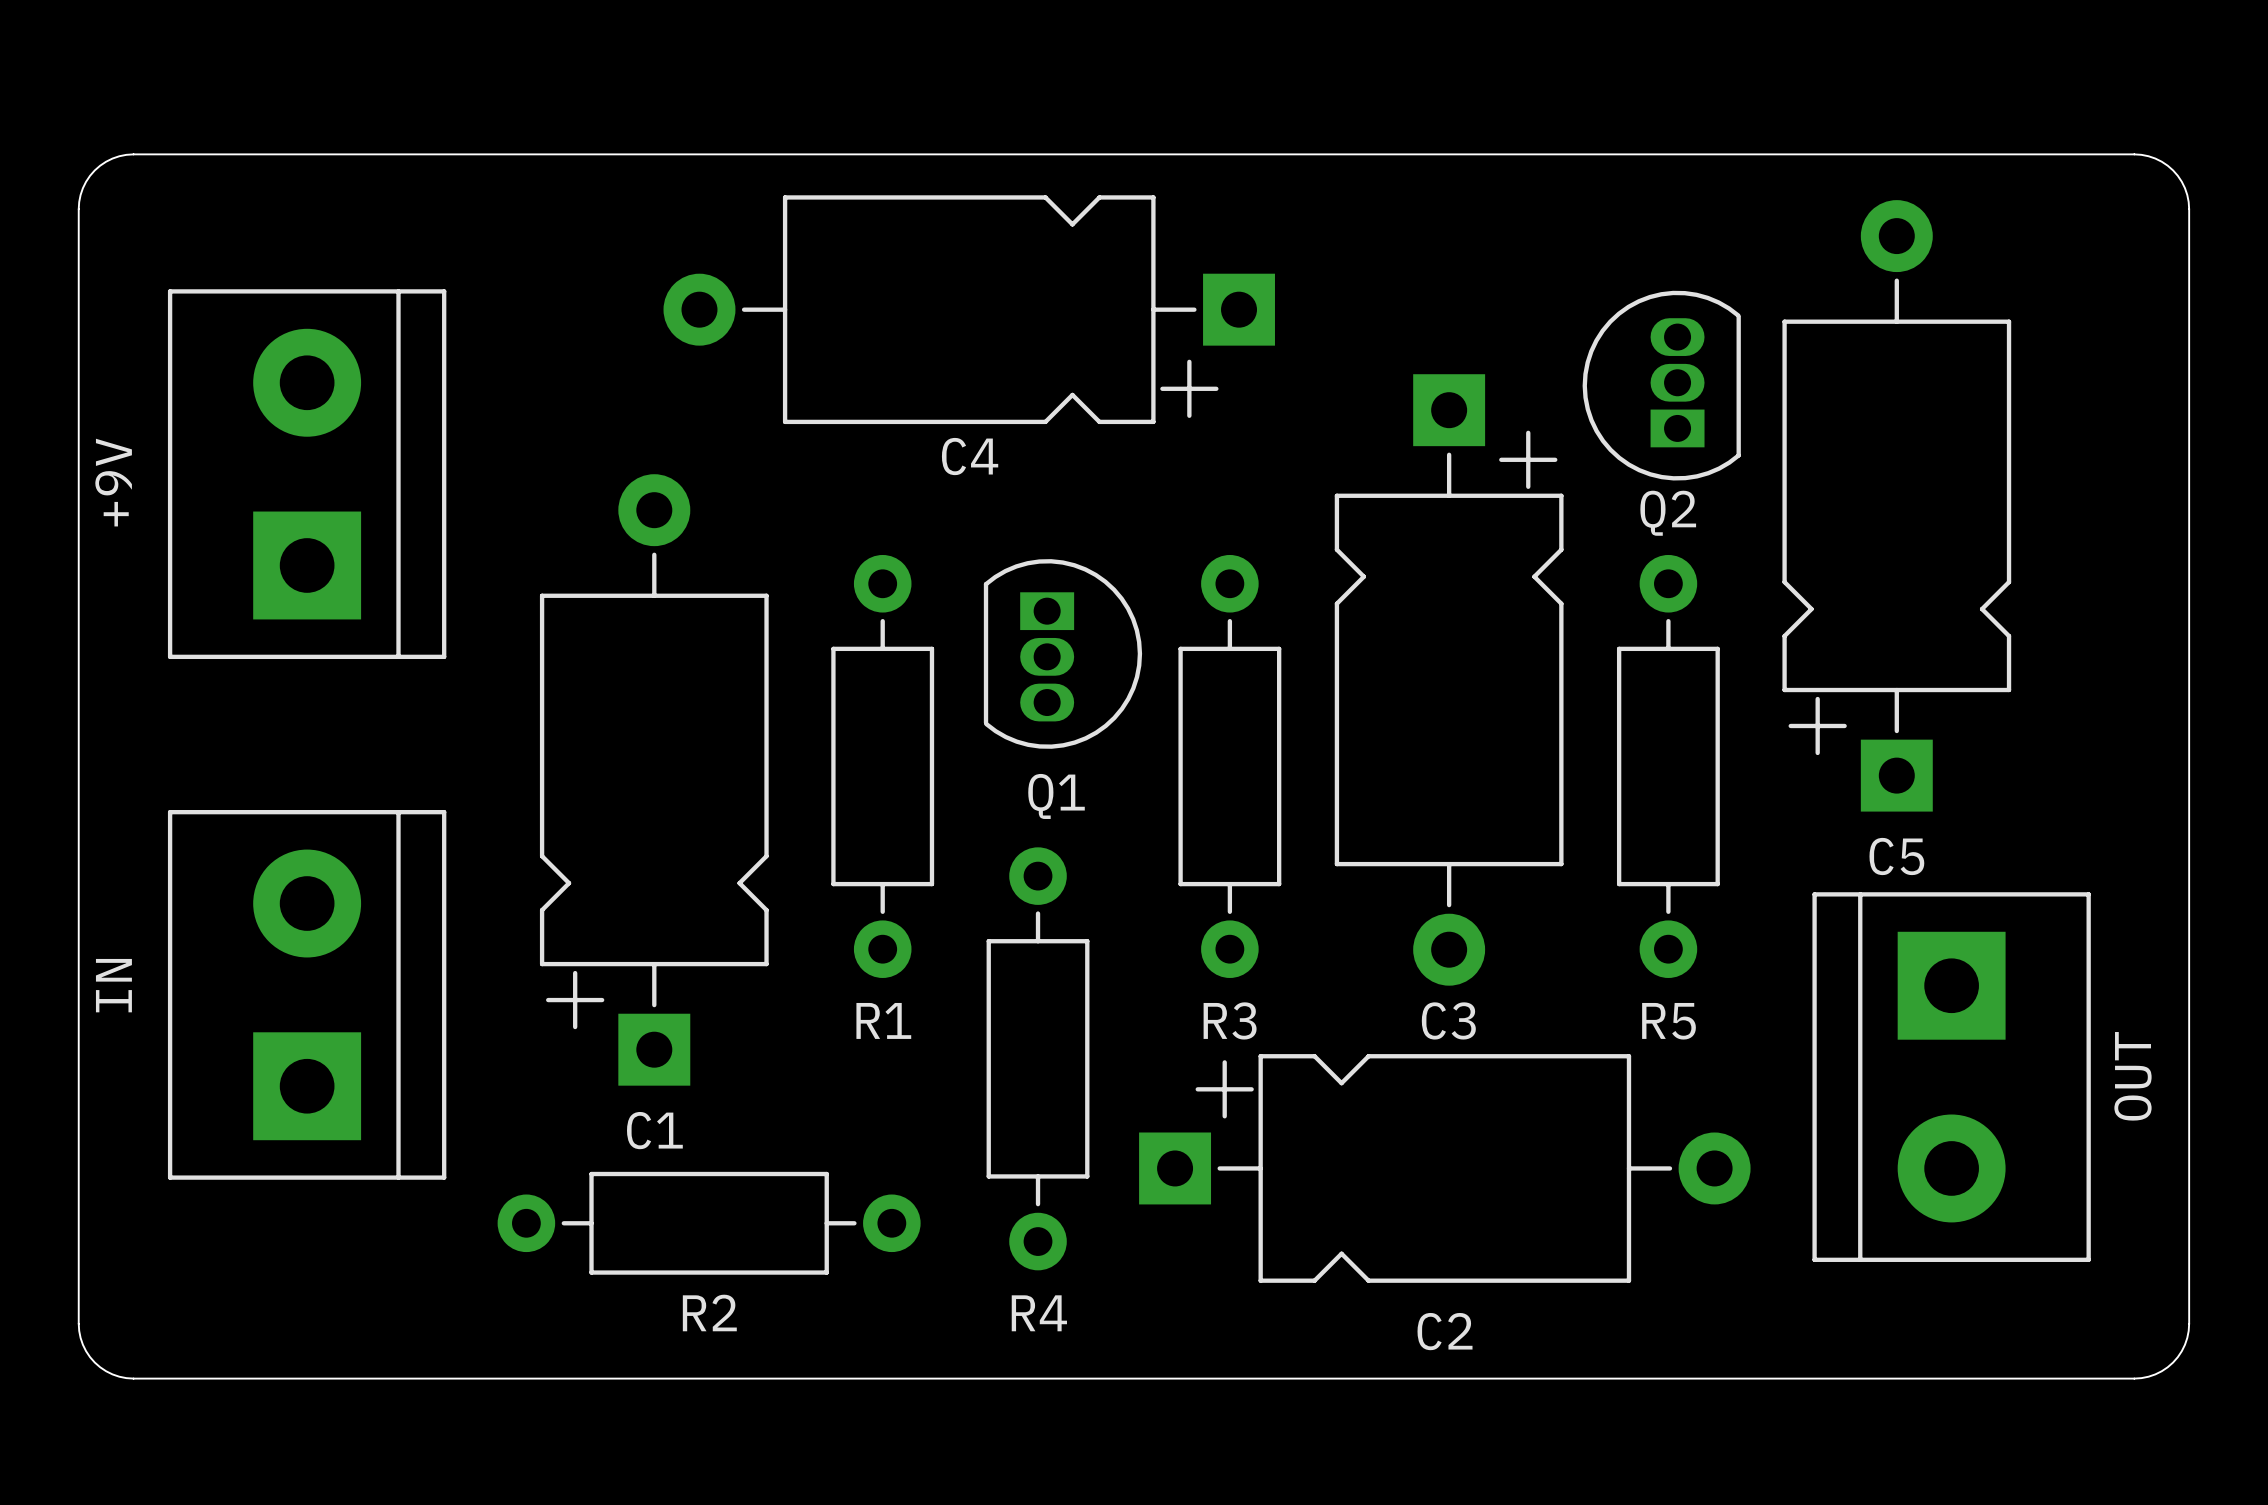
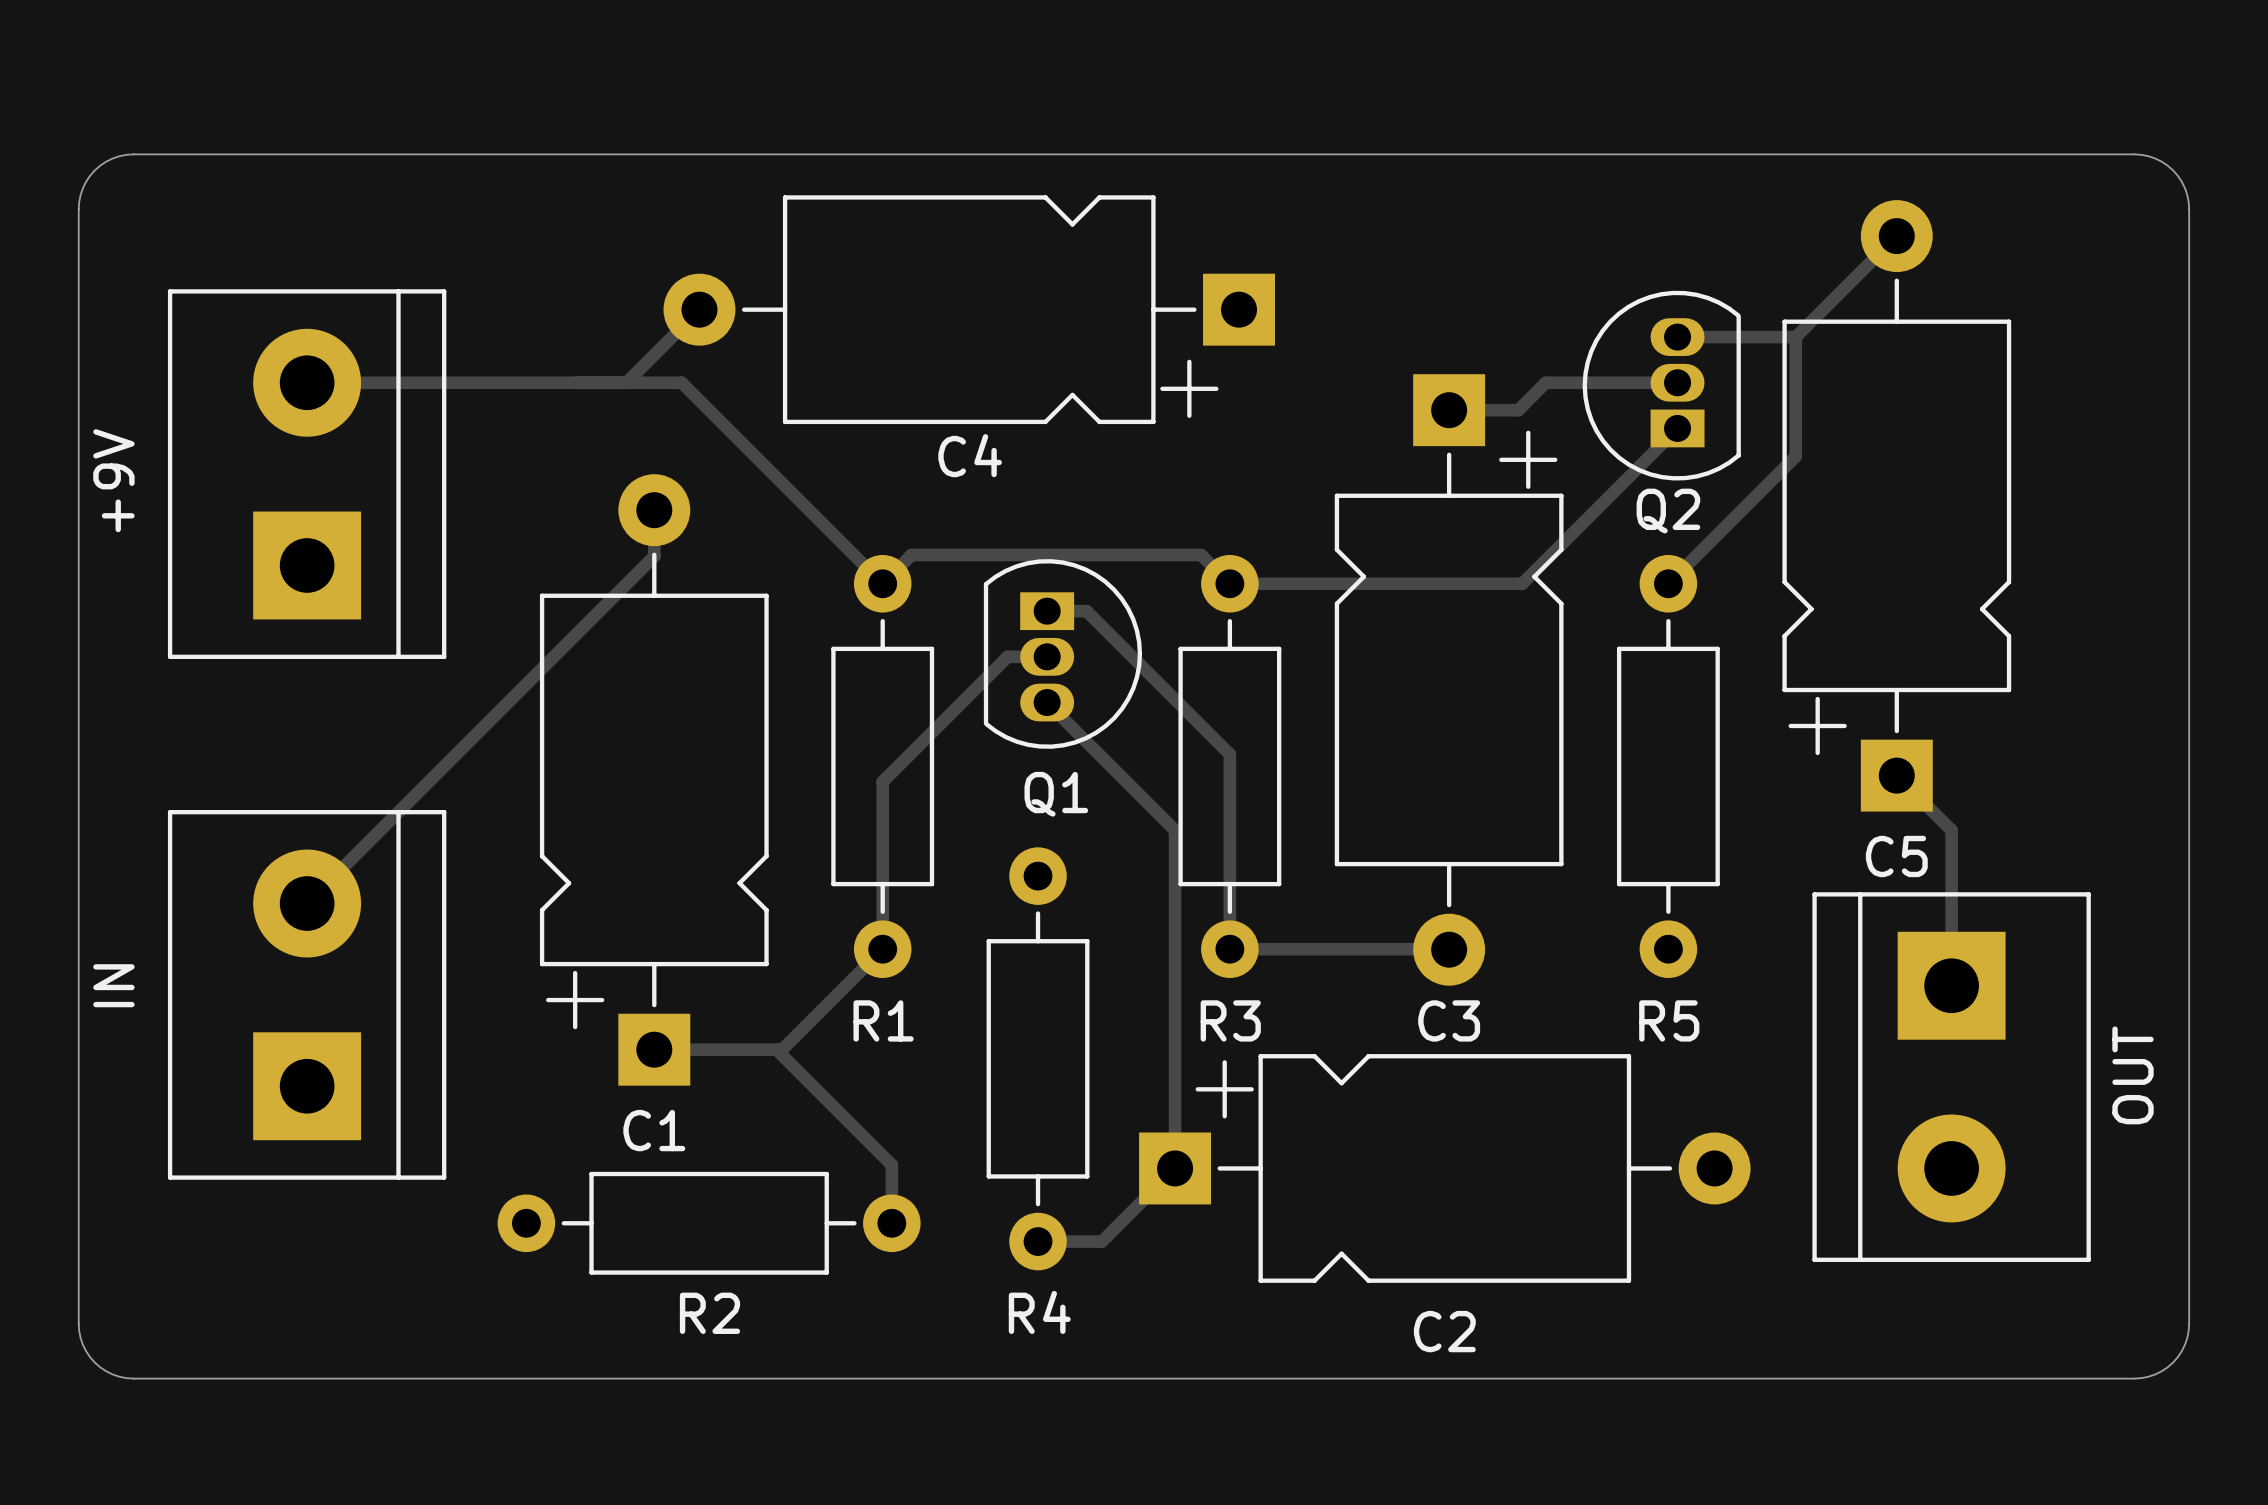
track: none -> (1896, 236) (1795, 337)
track: none -> (699, 309) (626, 382)
track: none -> (1677, 337) (1795, 337)
track: none -> (1795, 337) (1795, 456) (1668, 583)
track: none -> (307, 382) (681, 382) (882, 583) (911, 554) (1201, 554) (1229, 583) (1522, 583) (1677, 428)
track: none -> (1677, 382) (1545, 382) (1518, 410) (1449, 410)
track: none -> (654, 510) (654, 556) (307, 903)
track: none -> (1047, 611) (1086, 611) (1229, 754) (1229, 949) (1448, 949)
track: none -> (1047, 656) (1007, 656) (882, 781) (882, 949) (782, 1049) (654, 1049)
track: none -> (1047, 702) (1175, 830) (1175, 1168) (1101, 1241) (1038, 1241)
track: none -> (1896, 775) (1951, 830) (1951, 985)
track: none -> (776, 1049) (891, 1164) (891, 1223)

